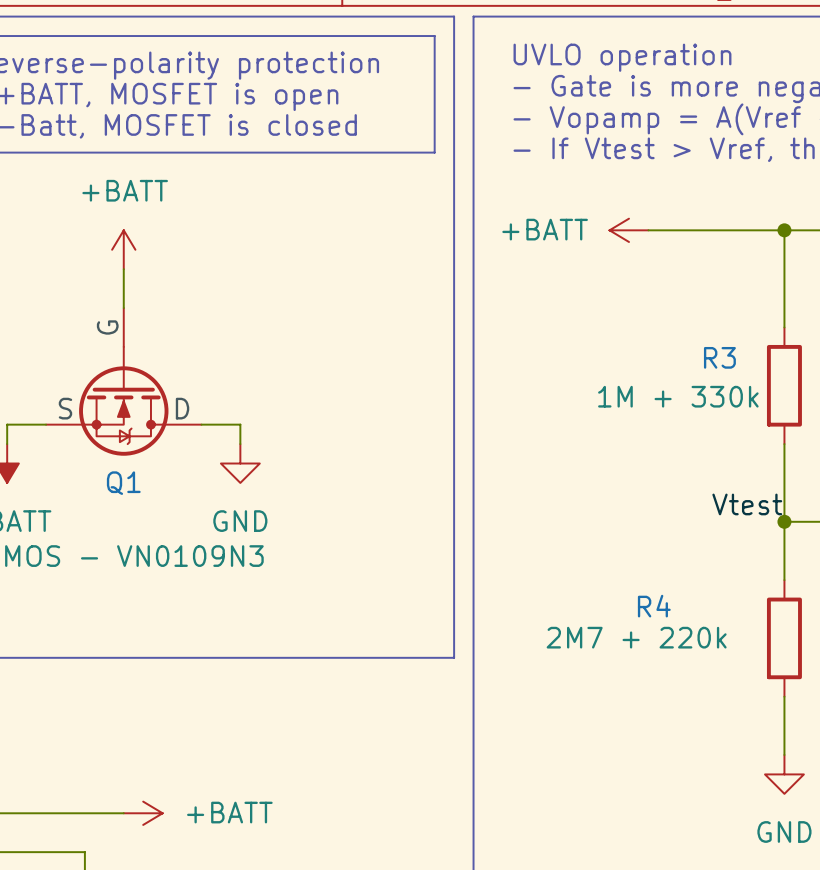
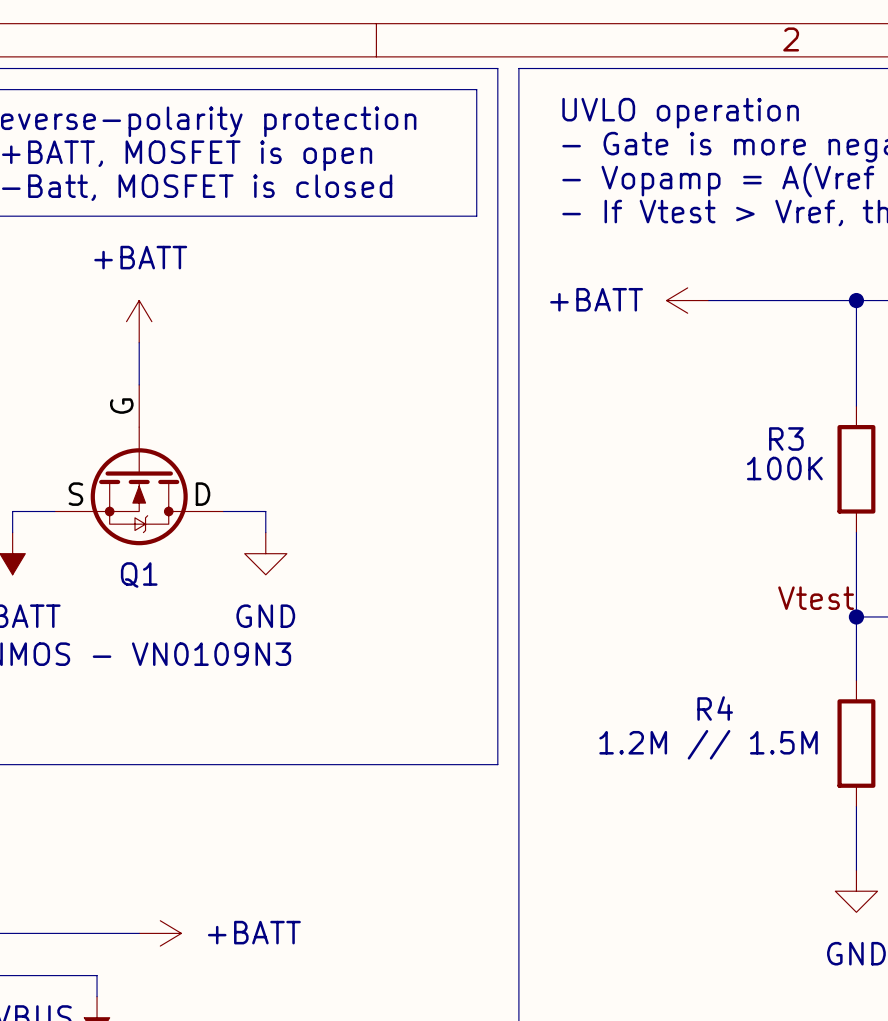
R3 value: 1M + 330k (678, 396) -> 100K (784, 468)
R4 value: 2M7 + 220k (636, 637) -> 1.2M // 1.5M (708, 744)

